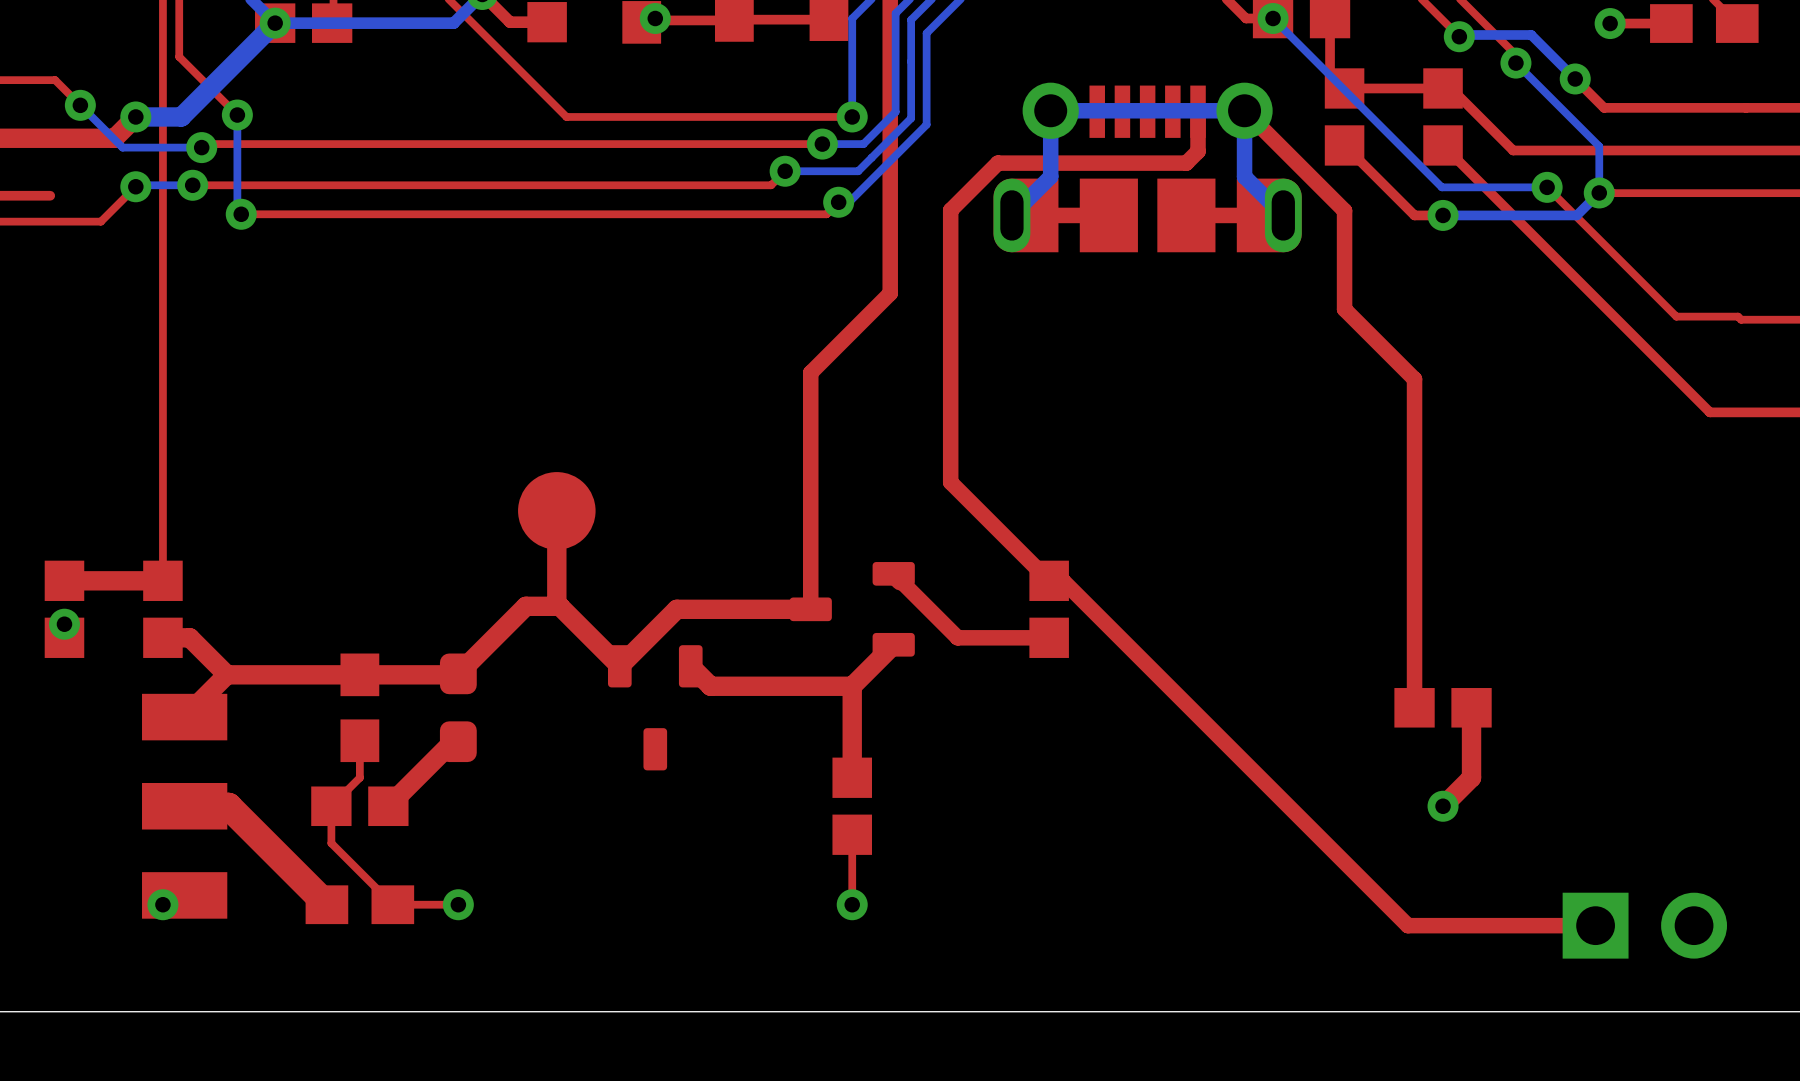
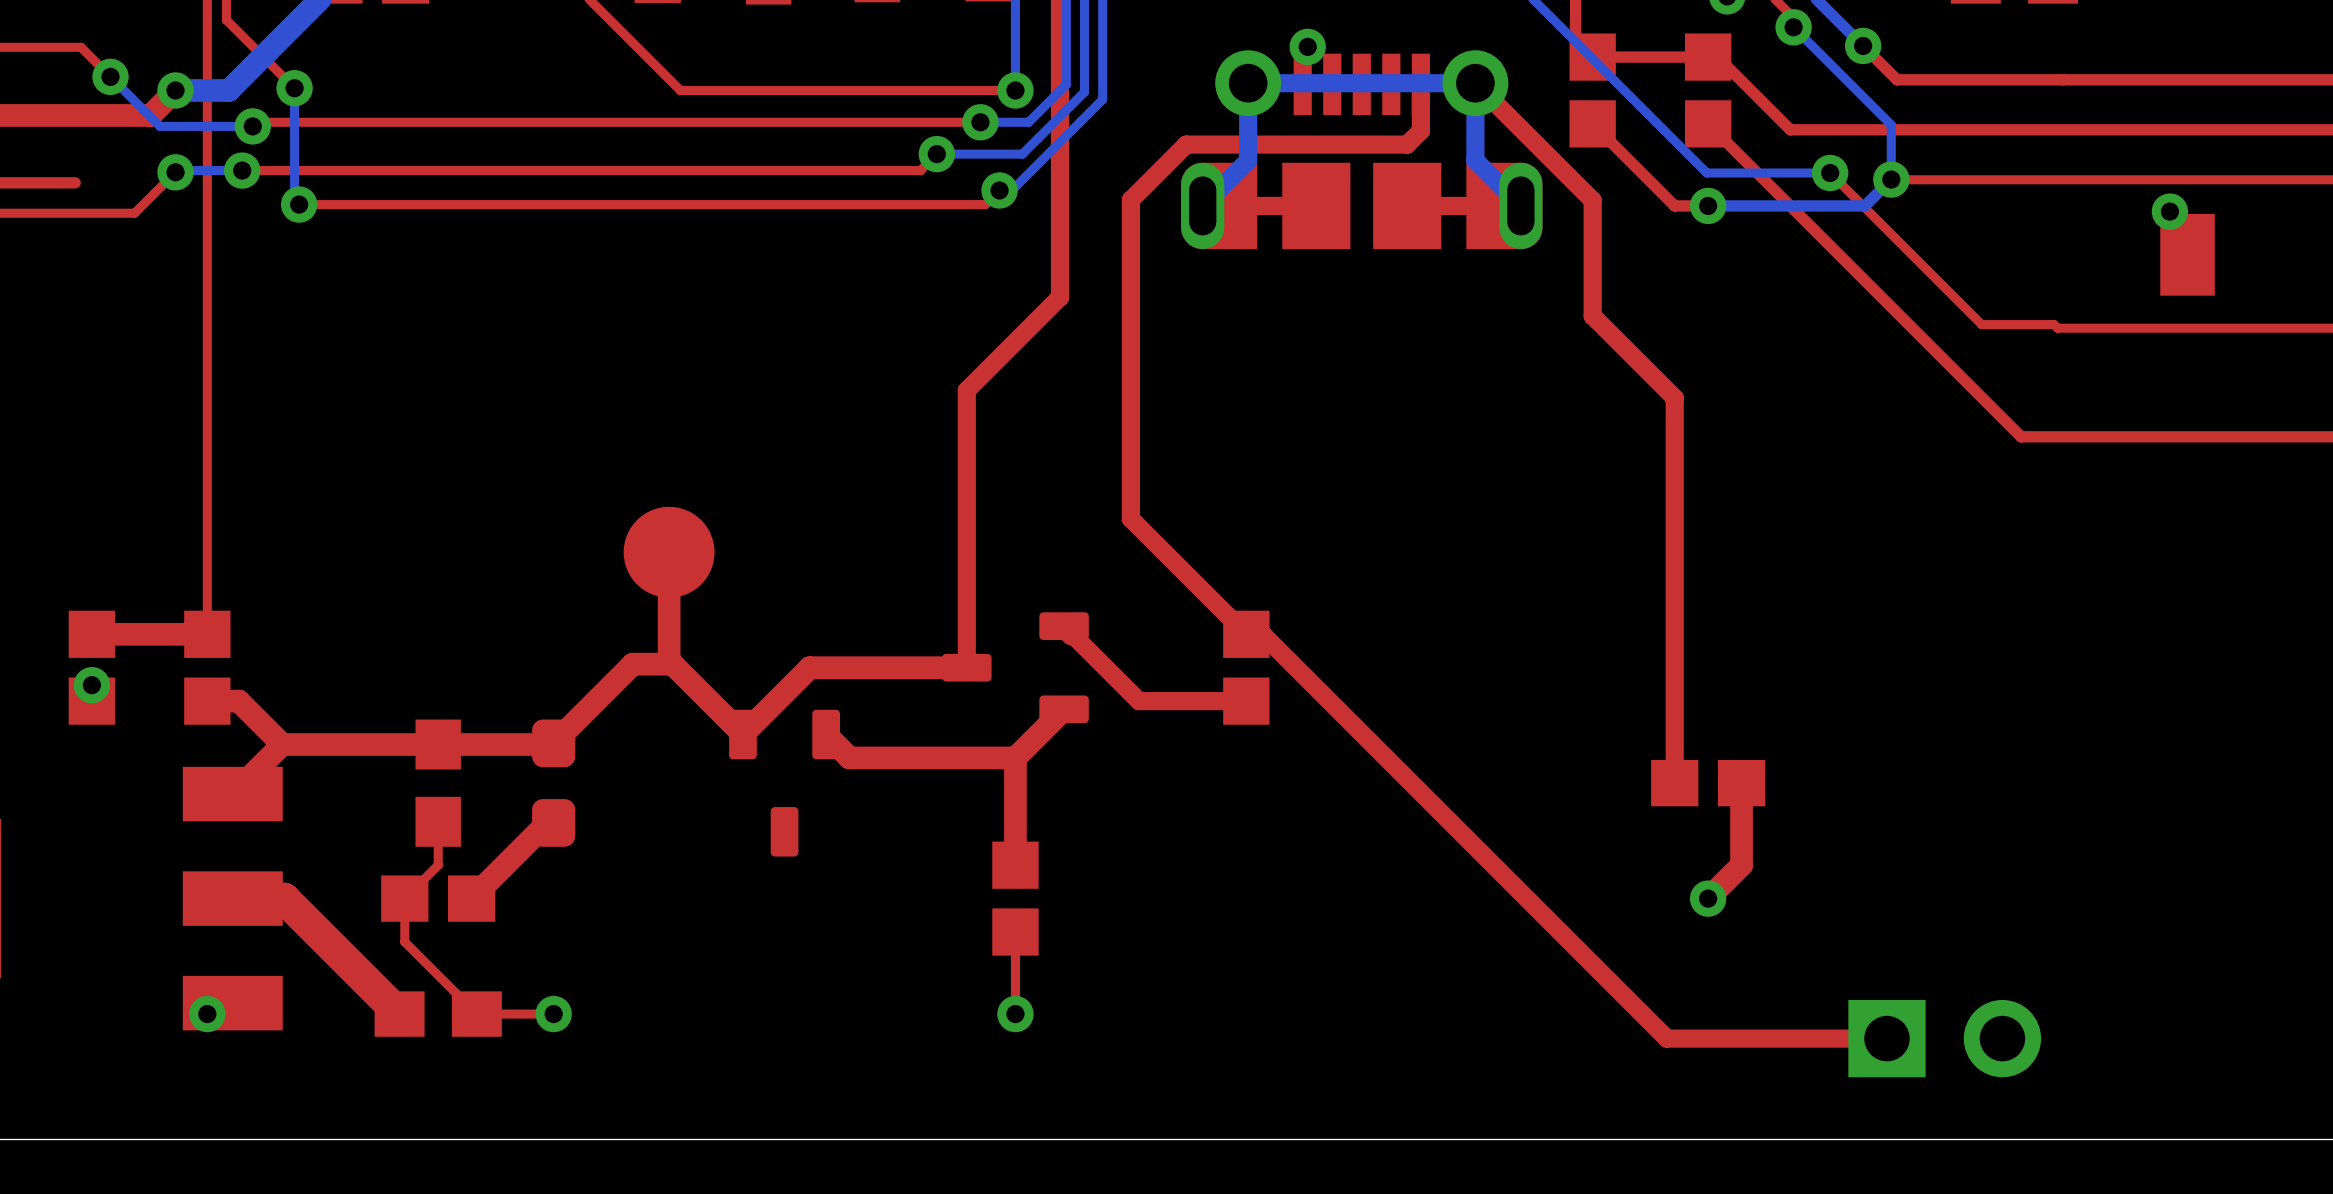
via: none -> (1307, 46)

